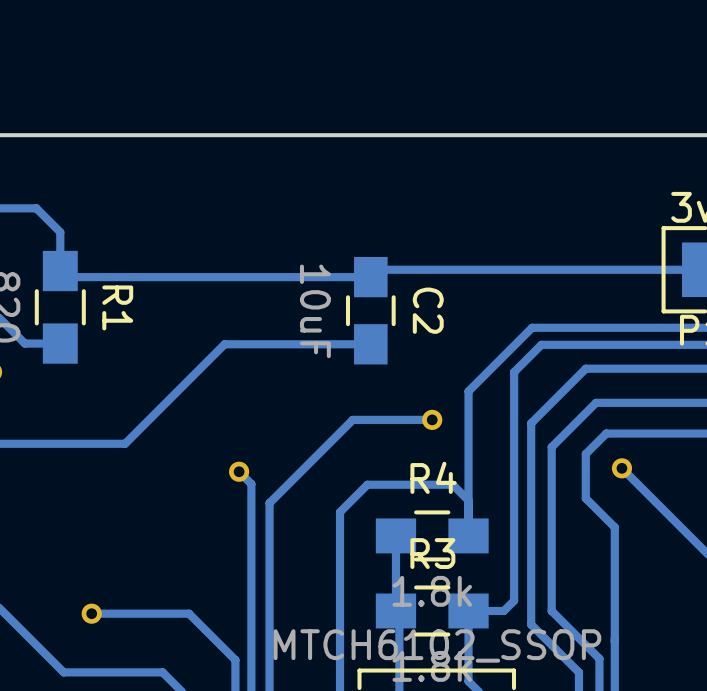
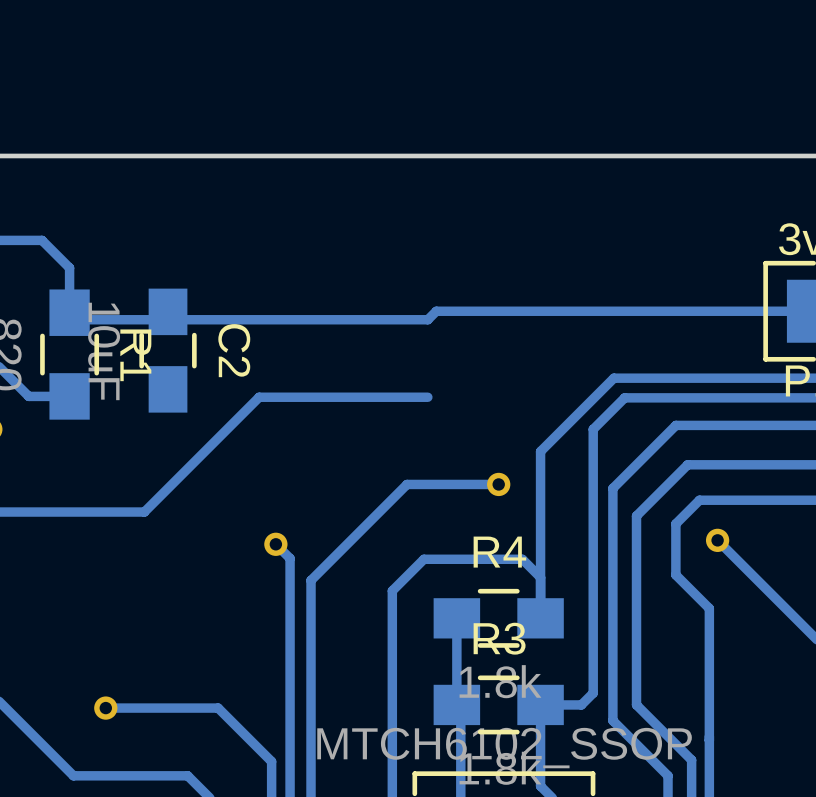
C2 position: (370, 310) -> (168, 350)

